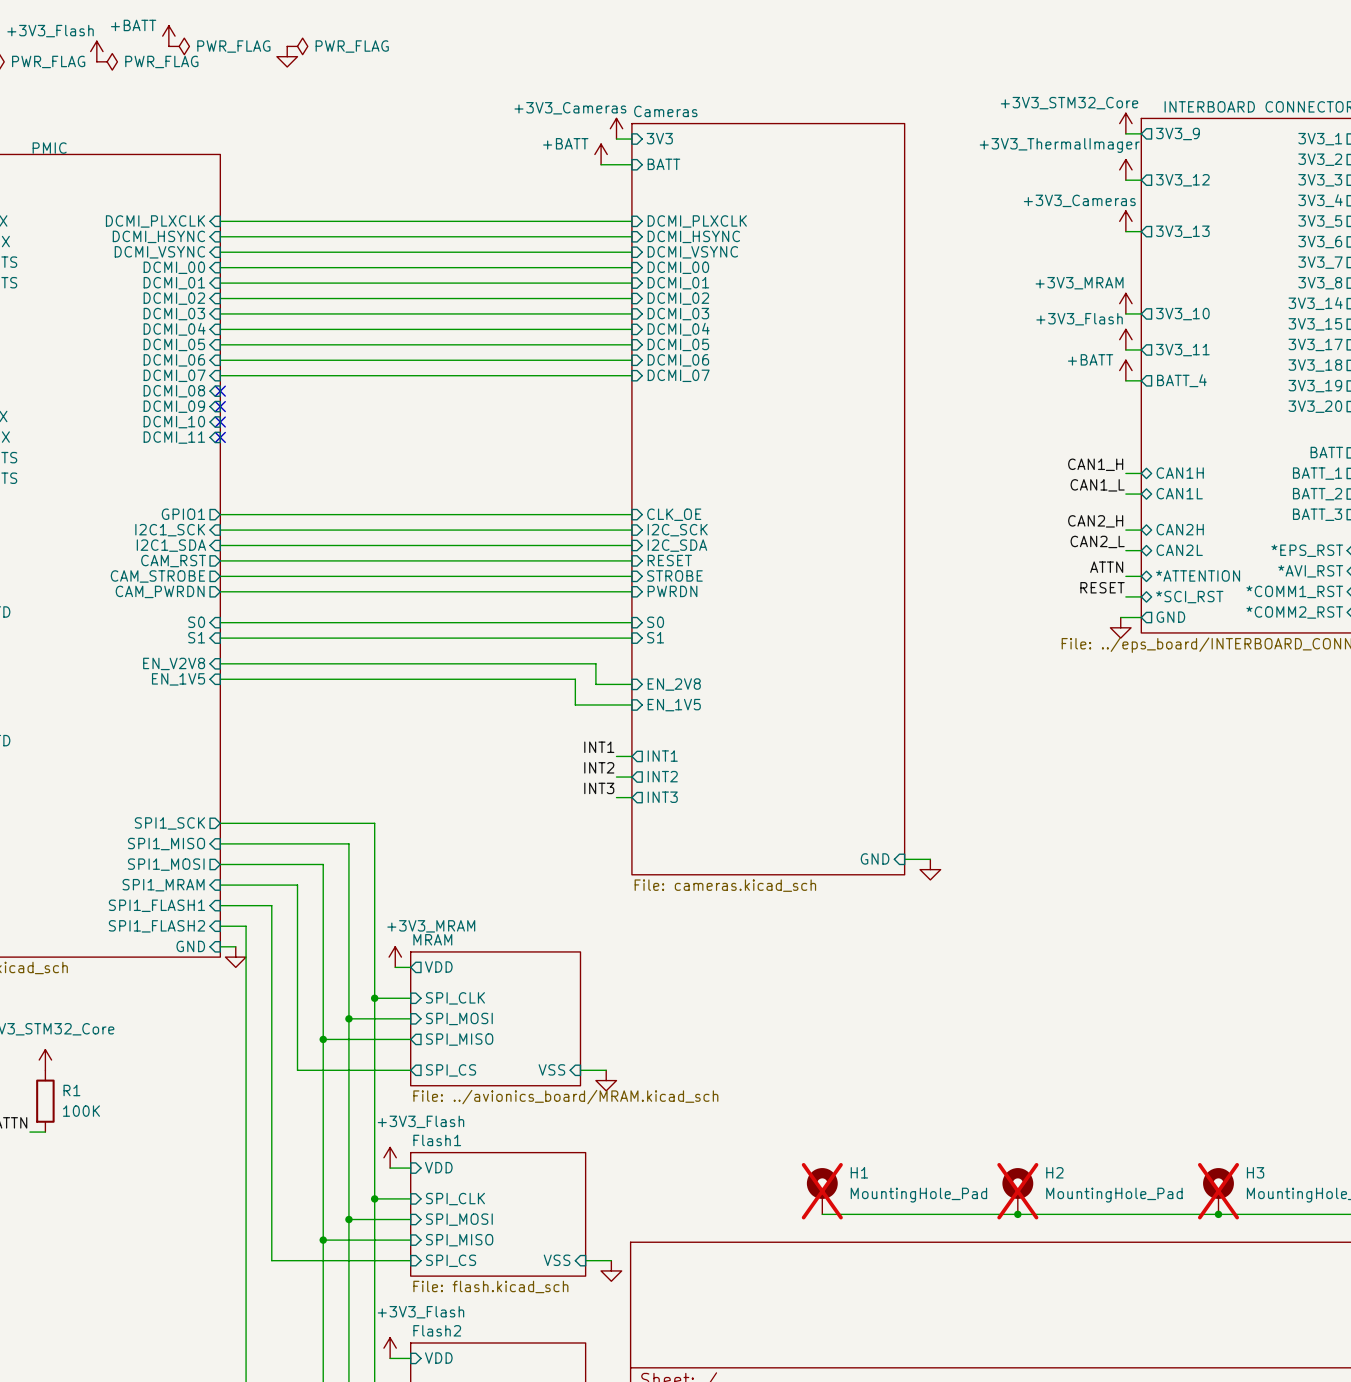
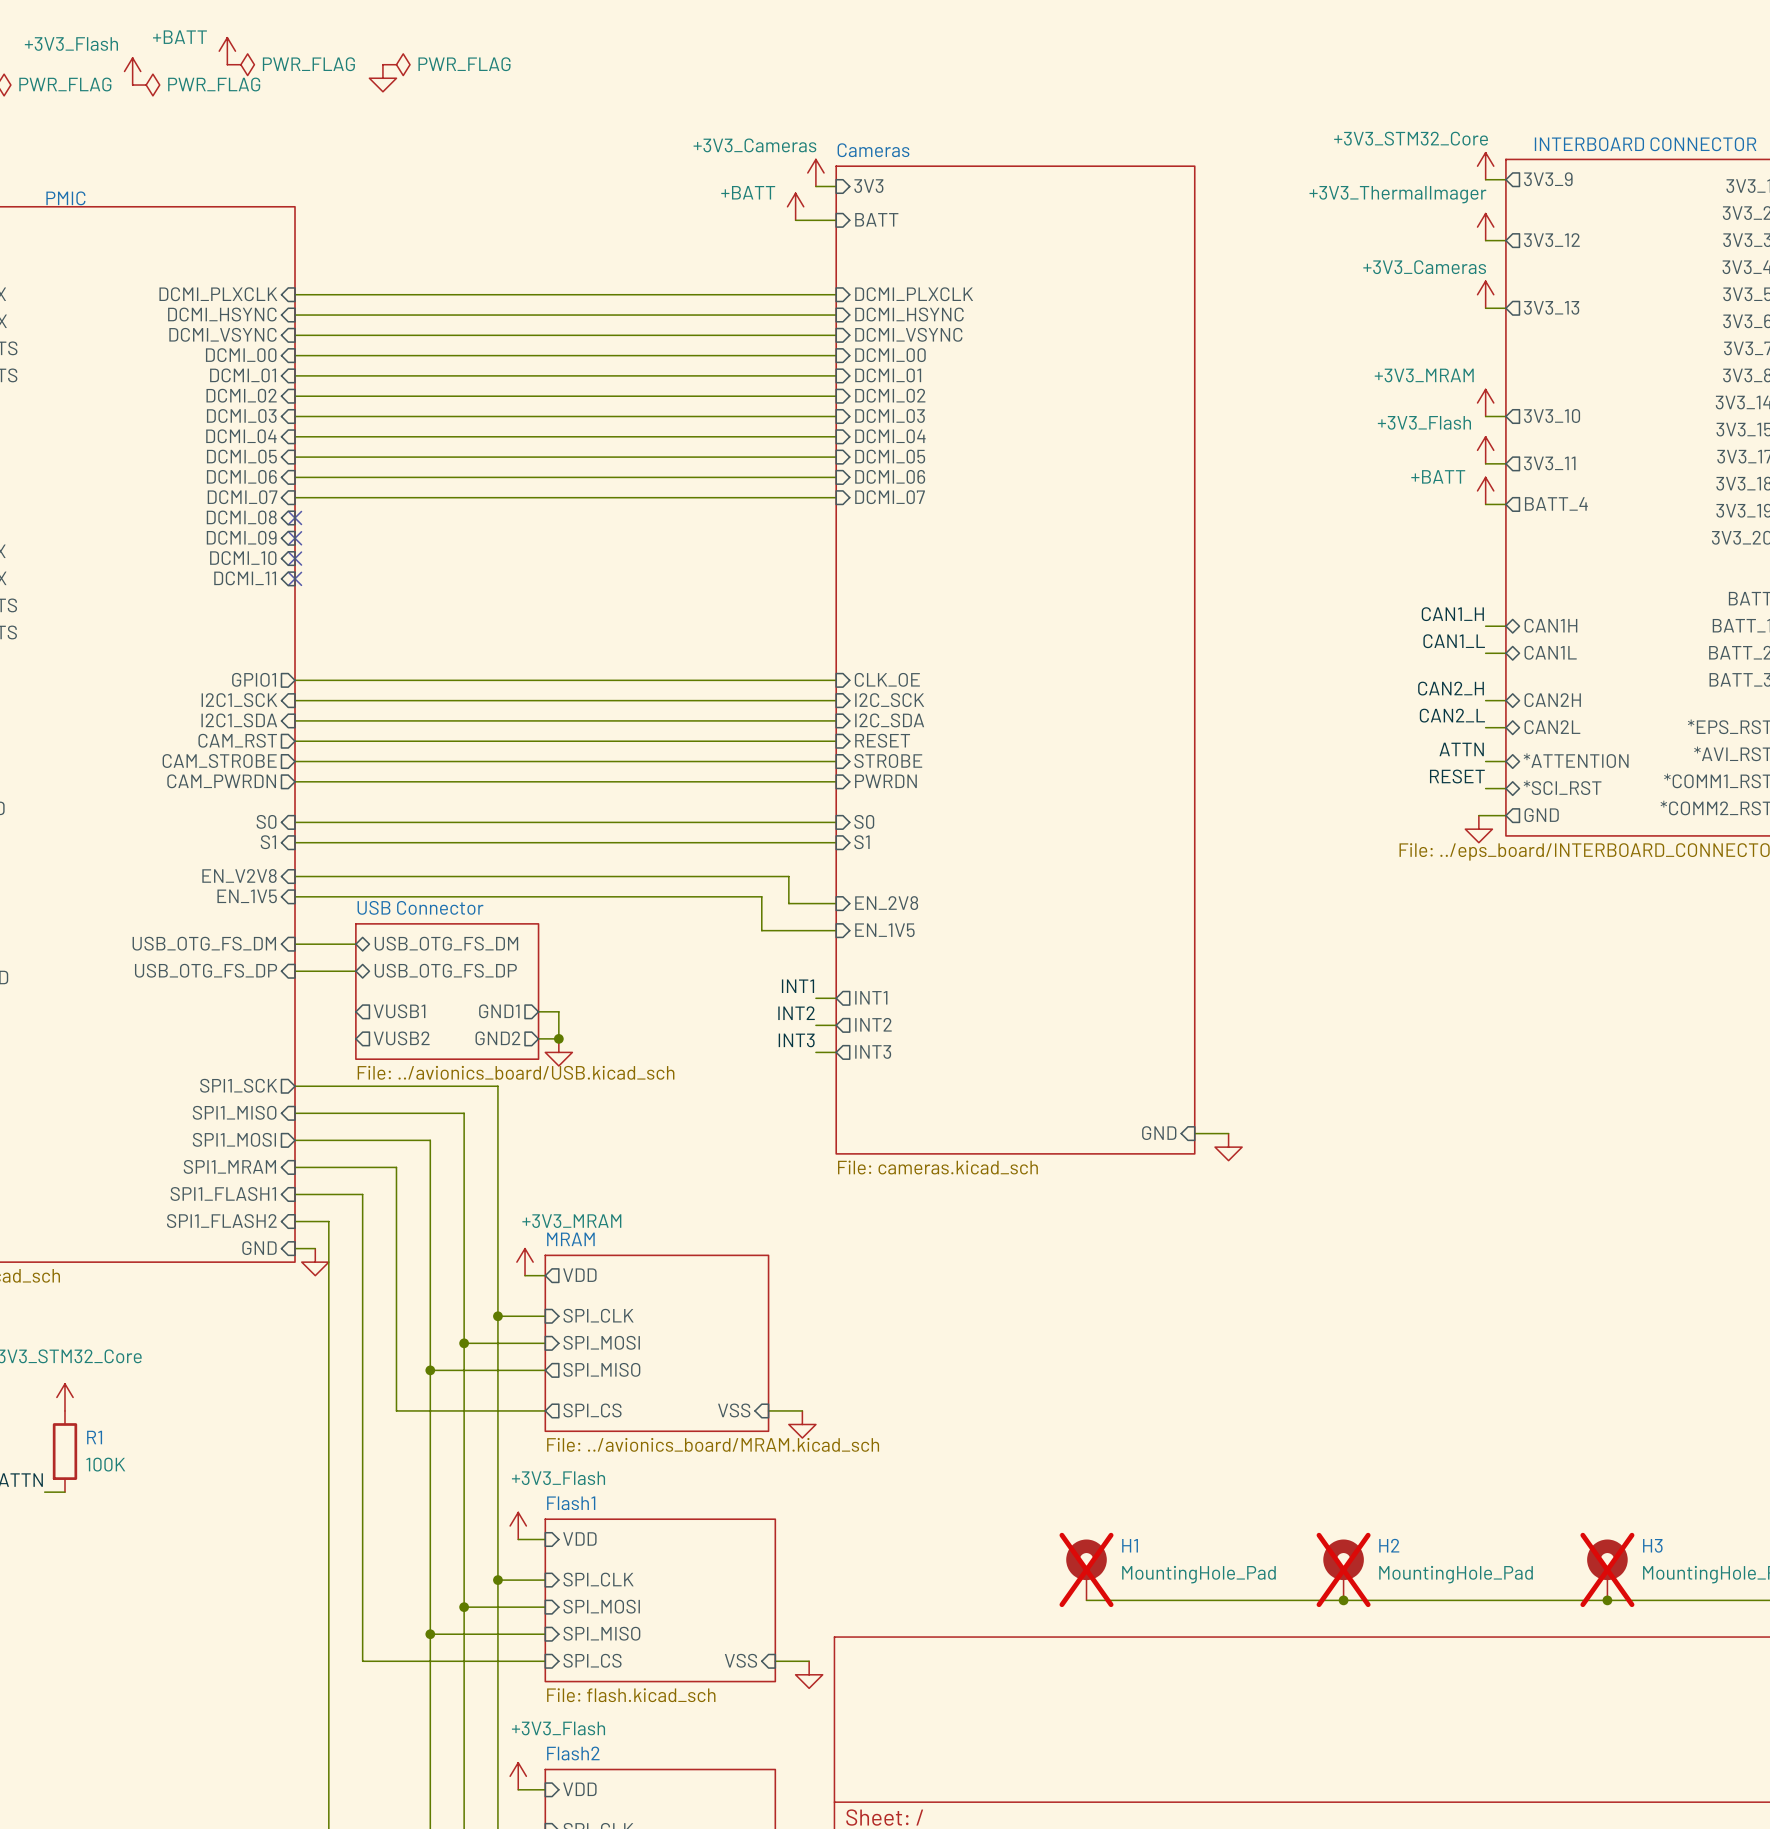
sheet pin: none -> USB_OTG_FS_DM (204, 943)
wire: none -> (295, 944) (355, 944)
sheet pin: none -> USB_OTG_FS_DM (446, 943)
sheet pin: none -> USB_OTG_FS_DP (206, 970)
wire: none -> (295, 971) (355, 971)
sheet pin: none -> USB_OTG_FS_DP (445, 970)
sheet USB Connector: none -> File: ../avionics_board/USB.kicad_sch (447, 991)
sheet pin: none -> VUSB1 (399, 1011)
sheet pin: none -> GND1 (499, 1011)
wire: none -> (538, 1011) (558, 1011) (558, 1038) (538, 1038)
sheet pin: none -> VUSB2 (401, 1038)
sheet pin: none -> GND2 (497, 1038)
junction: none -> (558, 1038)
power symbol: none -> (558, 1052)

